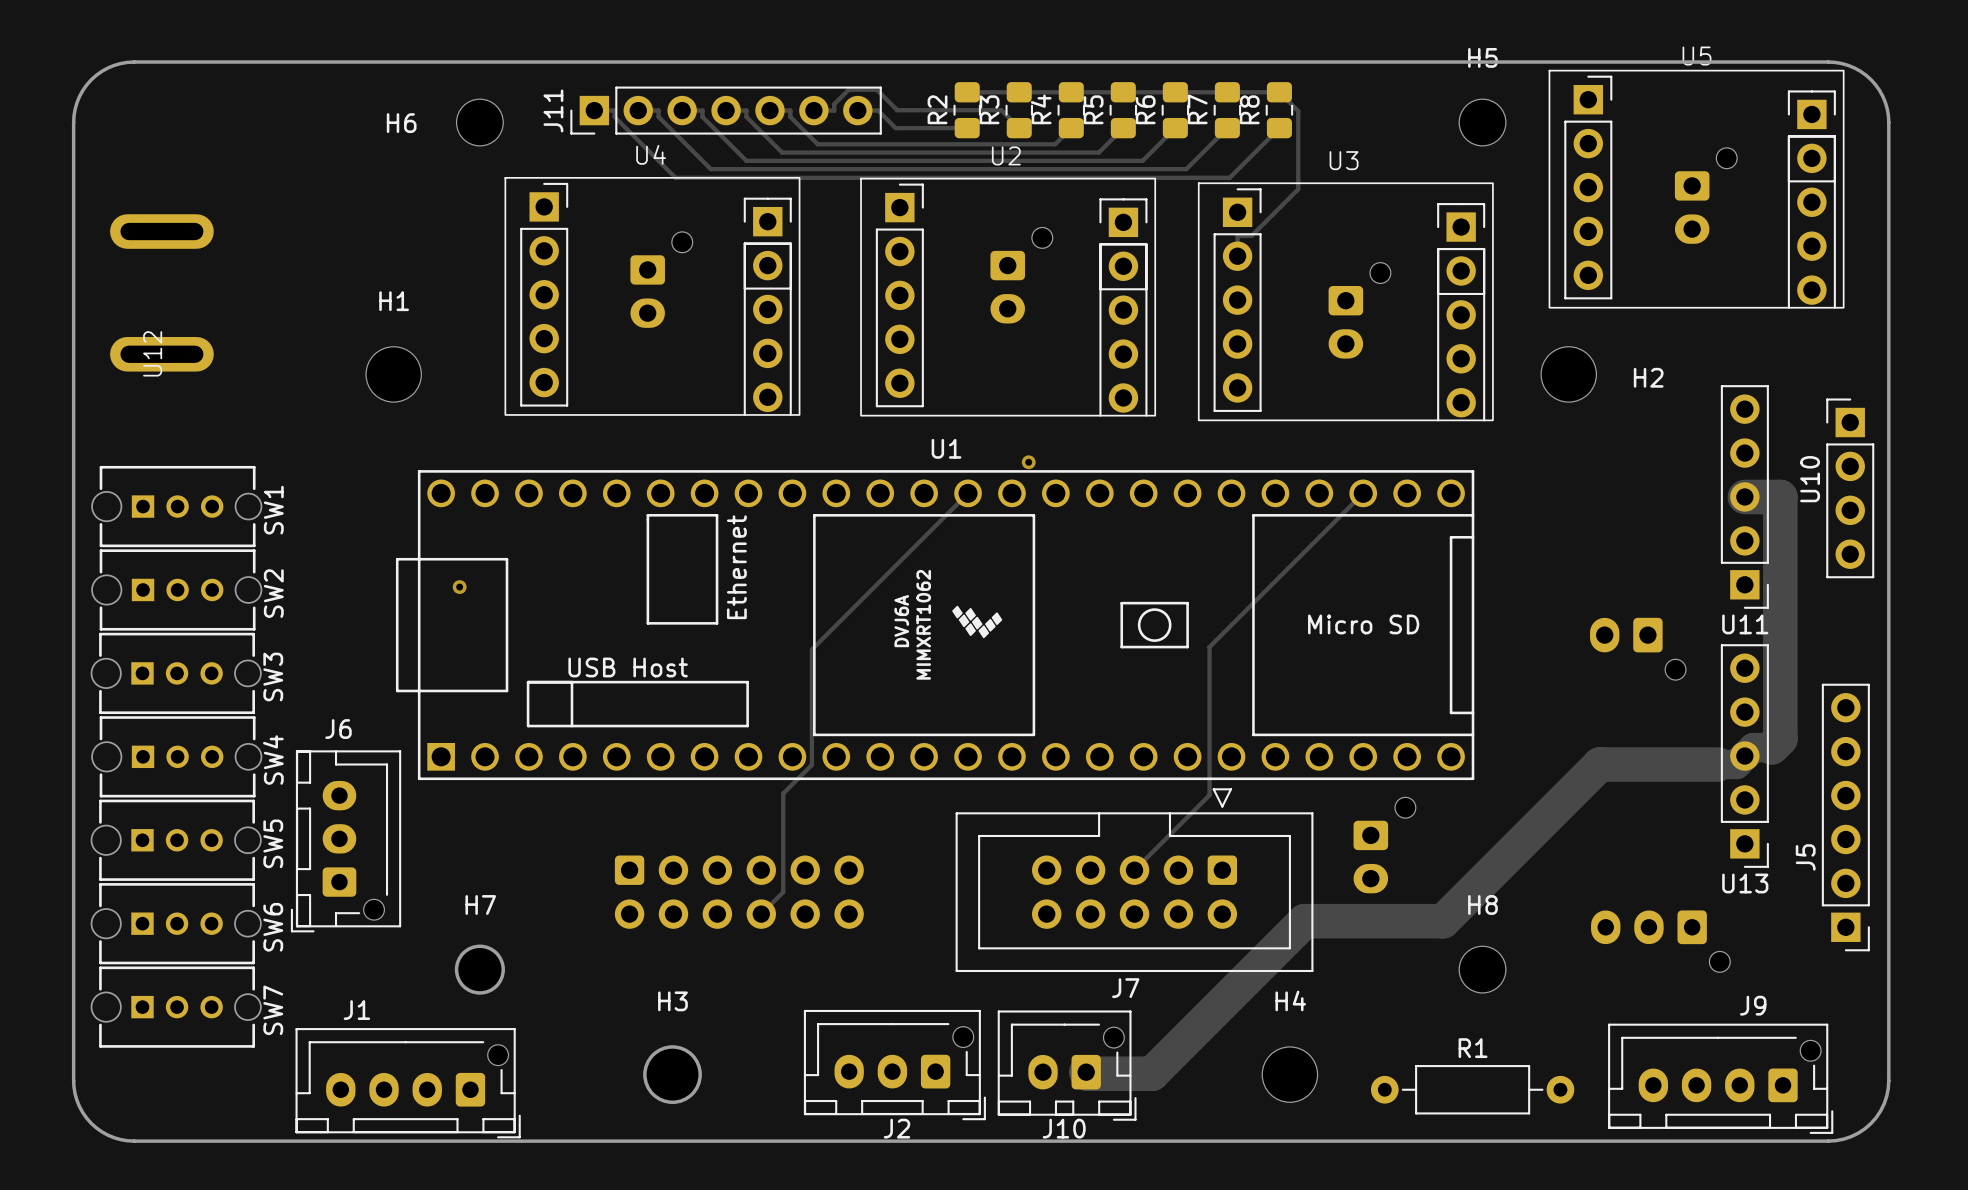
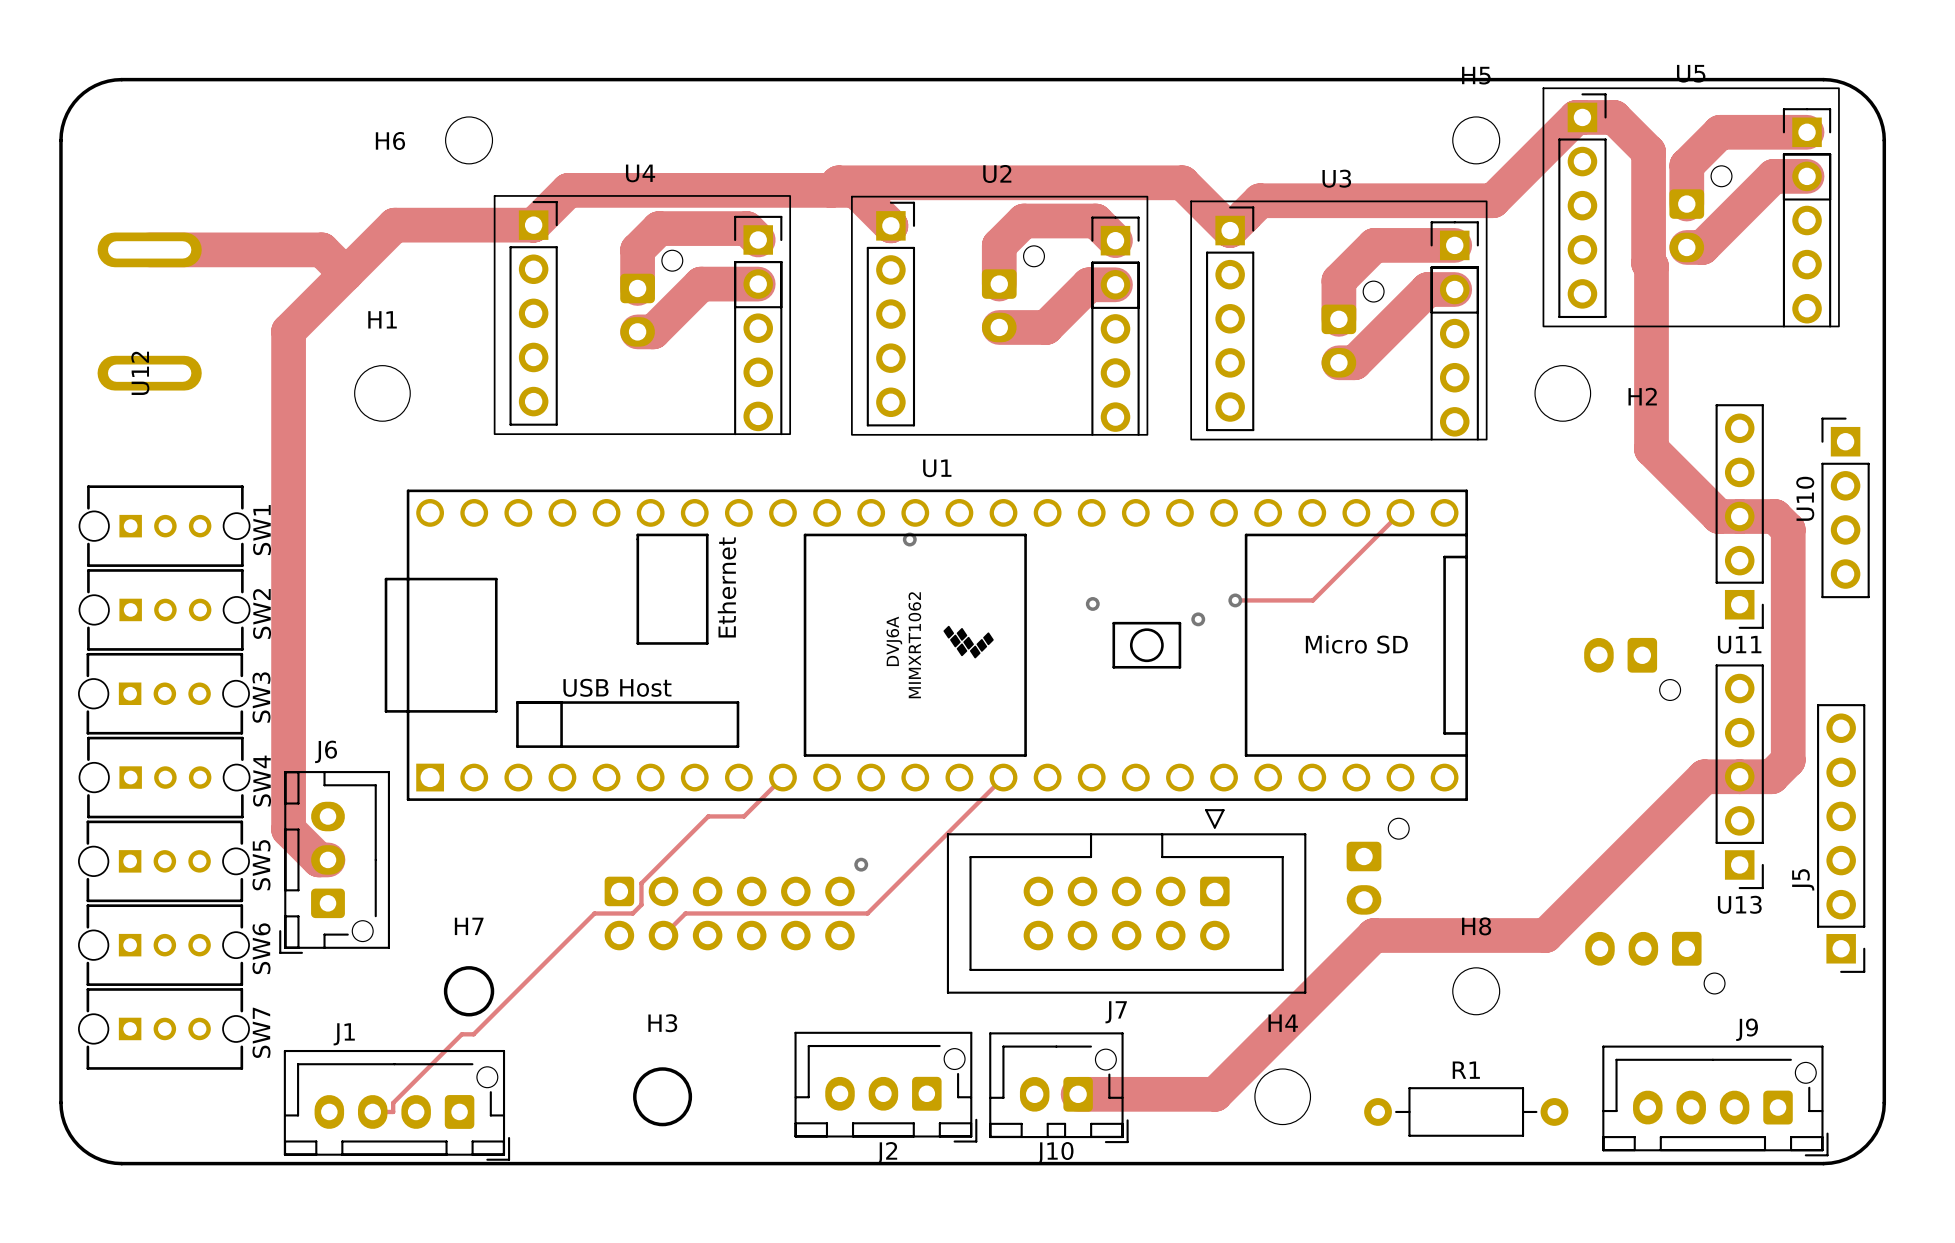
track: (967, 92) (1279, 92) (1298, 111) (1298, 189) (1251, 235) (1237, 235) (1237, 256) -> none
track: (594, 110) (614, 110) (614, 116) (675, 177) (1229, 177) (1279, 128) -> none
track: (638, 110) (658, 110) (658, 116) (710, 169) (1186, 169) (1227, 128) -> none
track: (682, 110) (702, 110) (702, 116) (746, 160) (1142, 160) (1175, 128) -> none
track: (726, 110) (746, 110) (746, 116) (782, 152) (1098, 152) (1123, 128) -> none
J11: (726, 110) -> none
track: (769, 110) (790, 110) (790, 116) (817, 144) (1055, 144) (1071, 128) -> none
track: (813, 110) (834, 110) (834, 104) (848, 89) (876, 89) (897, 110) (1001, 110) (1019, 128) -> none
track: (857, 110) (878, 110) (895, 128) (967, 128) -> none
R2: (967, 110) -> none
R3: (1019, 110) -> none
R4: (1071, 110) -> none
R5: (1123, 110) -> none
R6: (1175, 110) -> none
R7: (1227, 110) -> none
R8: (1279, 110) -> none
track: none -> (1807, 132) (1720, 132) (1686, 165) (1686, 204)
track: none -> (1807, 176) (1773, 176) (1702, 247) (1686, 247)
track: none -> (831, 190) (838, 182) (1182, 182) (1230, 230)
track: none -> (890, 225) (855, 190) (568, 190) (533, 225) (394, 225) (288, 331) (288, 829) (318, 859) (327, 859)
track: none -> (1230, 230) (1259, 200) (1492, 200) (1576, 117) (1614, 117) (1648, 151) (1648, 263) (1651, 266) (1651, 449) (1718, 516) (1739, 516)
track: none -> (758, 239) (746, 228) (659, 228) (637, 250) (637, 288)
track: none -> (1115, 240) (1095, 221) (1023, 221) (999, 245) (999, 284)
track: none -> (1454, 245) (1374, 245) (1338, 280) (1338, 319)
track: none -> (149, 249) (321, 249) (345, 273)
track: none -> (758, 284) (701, 284) (653, 331) (637, 331)
track: none -> (1115, 284) (1088, 284) (1046, 327) (999, 327)
track: none -> (1454, 289) (1427, 289) (1354, 362) (1338, 362)
via: (1028, 462) -> none
track: (968, 493) (811, 649) (811, 764) (783, 793) (783, 892) (761, 914) -> none
track: (1363, 493) (1209, 647) (1209, 795) (1134, 870) -> none
track: none -> (1400, 512) (1312, 600) (1235, 600)
track: (1780, 496) (1780, 738) (1771, 747) (1753, 747) (1736, 764) (1599, 764) (1443, 921) (1304, 921) (1151, 1073) (1087, 1073) (1086, 1072) -> (1775, 516) (1788, 529) (1788, 760) (1771, 776) (1704, 776) (1545, 935) (1373, 935) (1215, 1094) (1078, 1094)
via: none -> (909, 539)
via: none -> (1235, 600)
via: none -> (1092, 603)
via: (459, 587) -> none
via: none -> (1198, 619)
track: none -> (782, 777) (744, 816) (708, 816) (641, 883) (641, 904) (632, 913) (594, 913) (473, 1034) (461, 1034) (393, 1103) (393, 1111) (372, 1111)
track: none -> (1003, 777) (867, 913) (685, 913) (663, 935)
via: none -> (861, 864)

